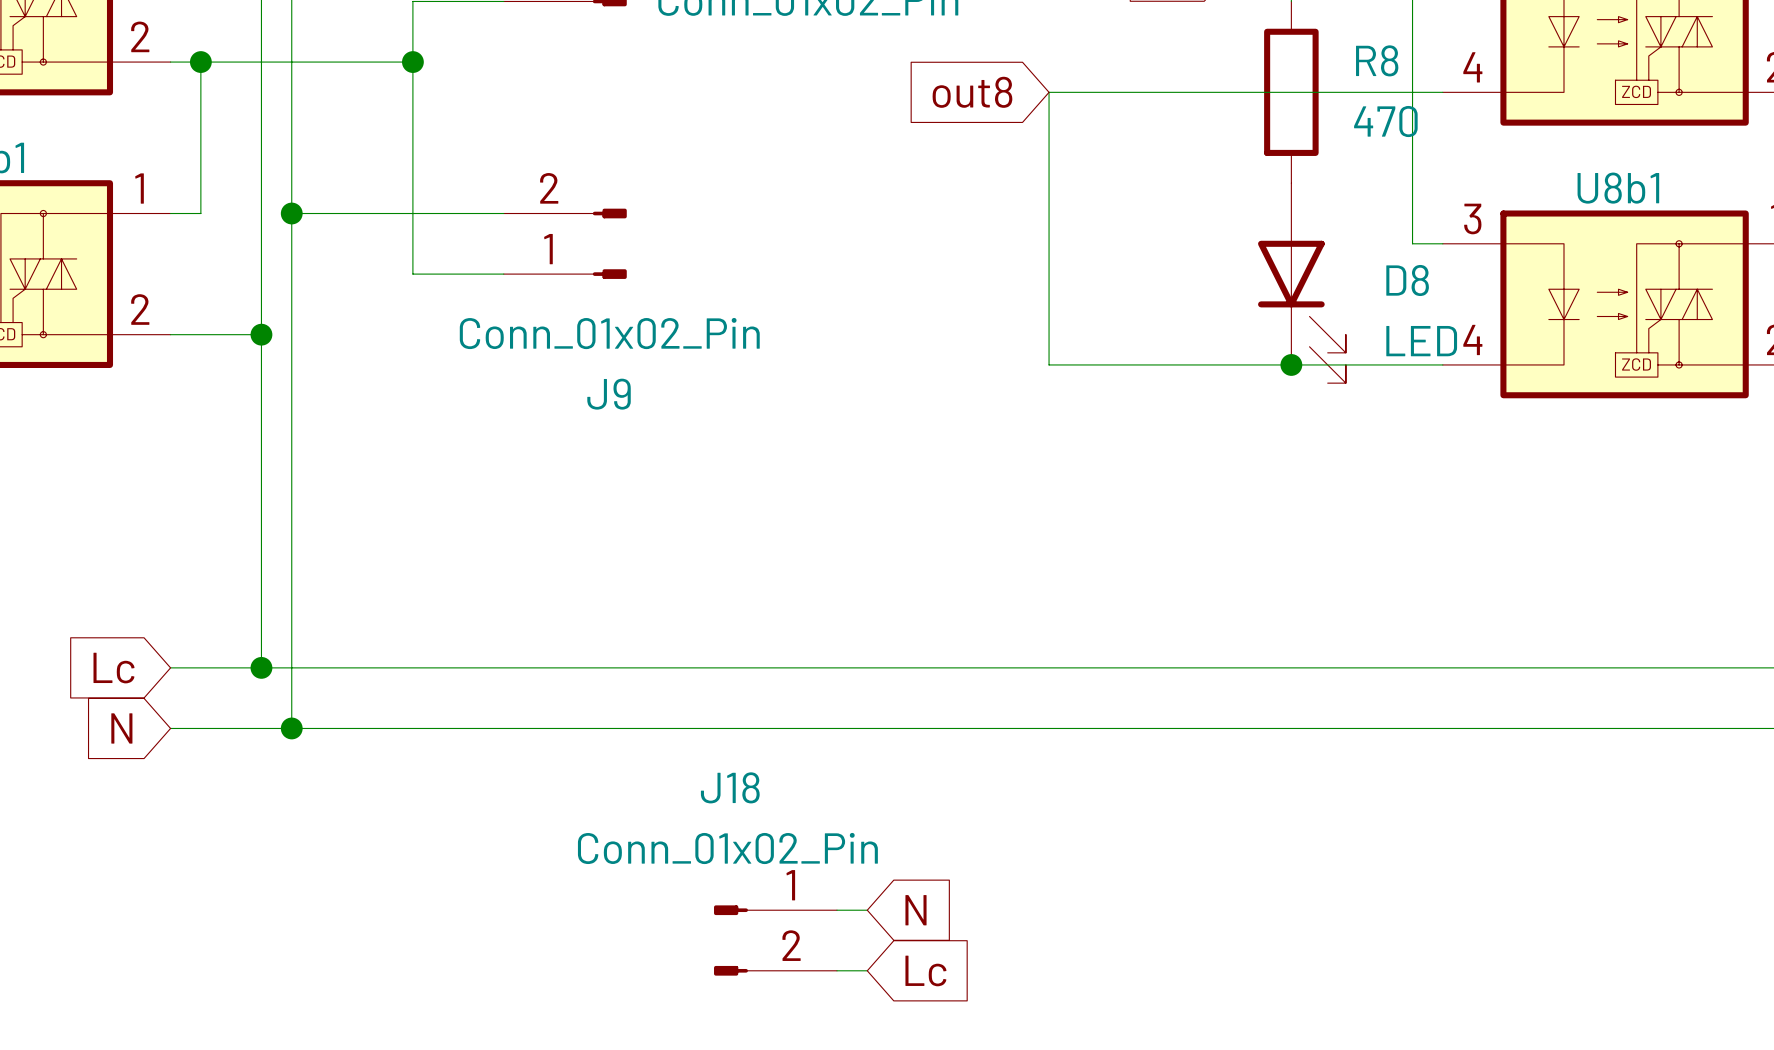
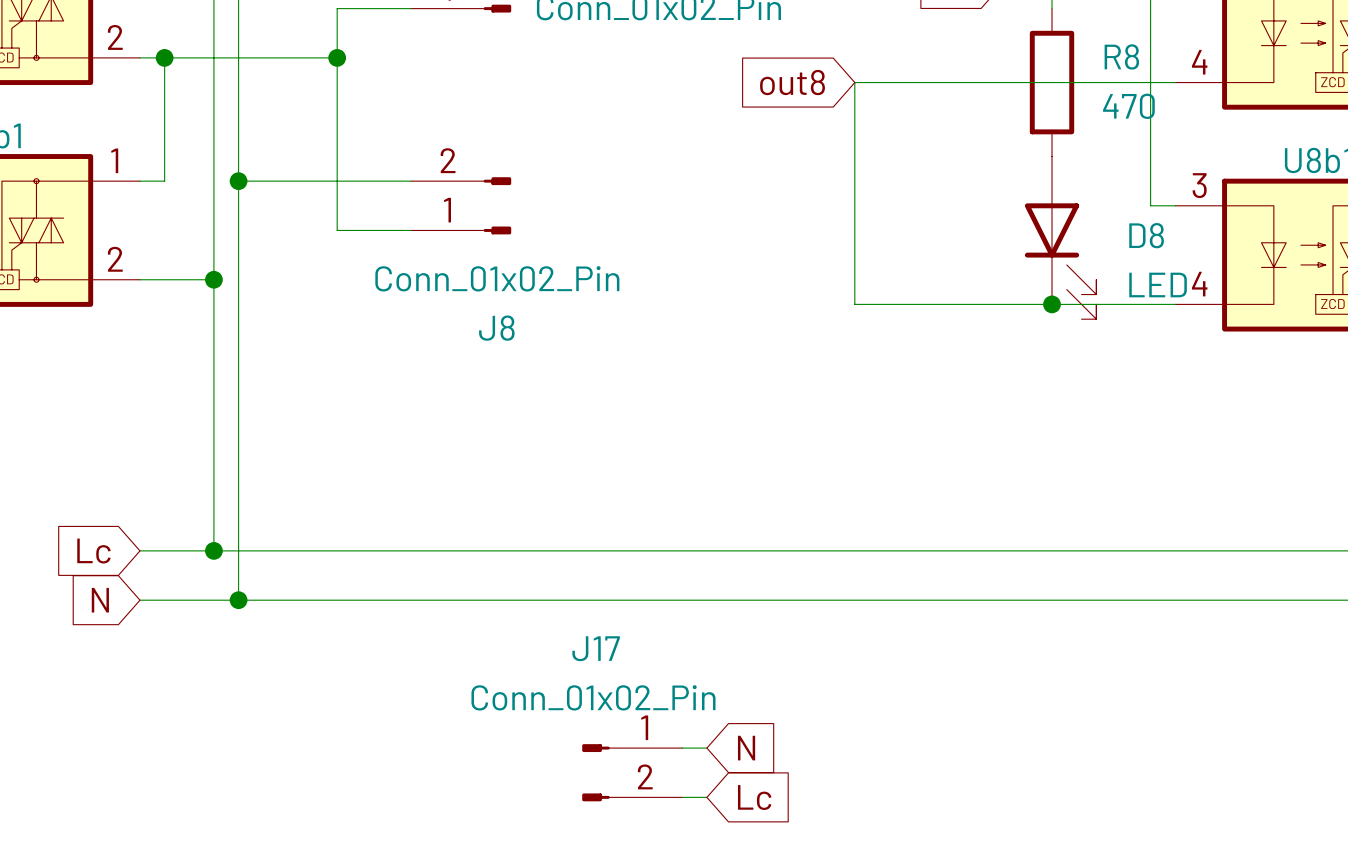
J9 name: J9 (609, 394) -> J8 (496, 328)
J18 name: J18 (730, 787) -> J17 (596, 648)

